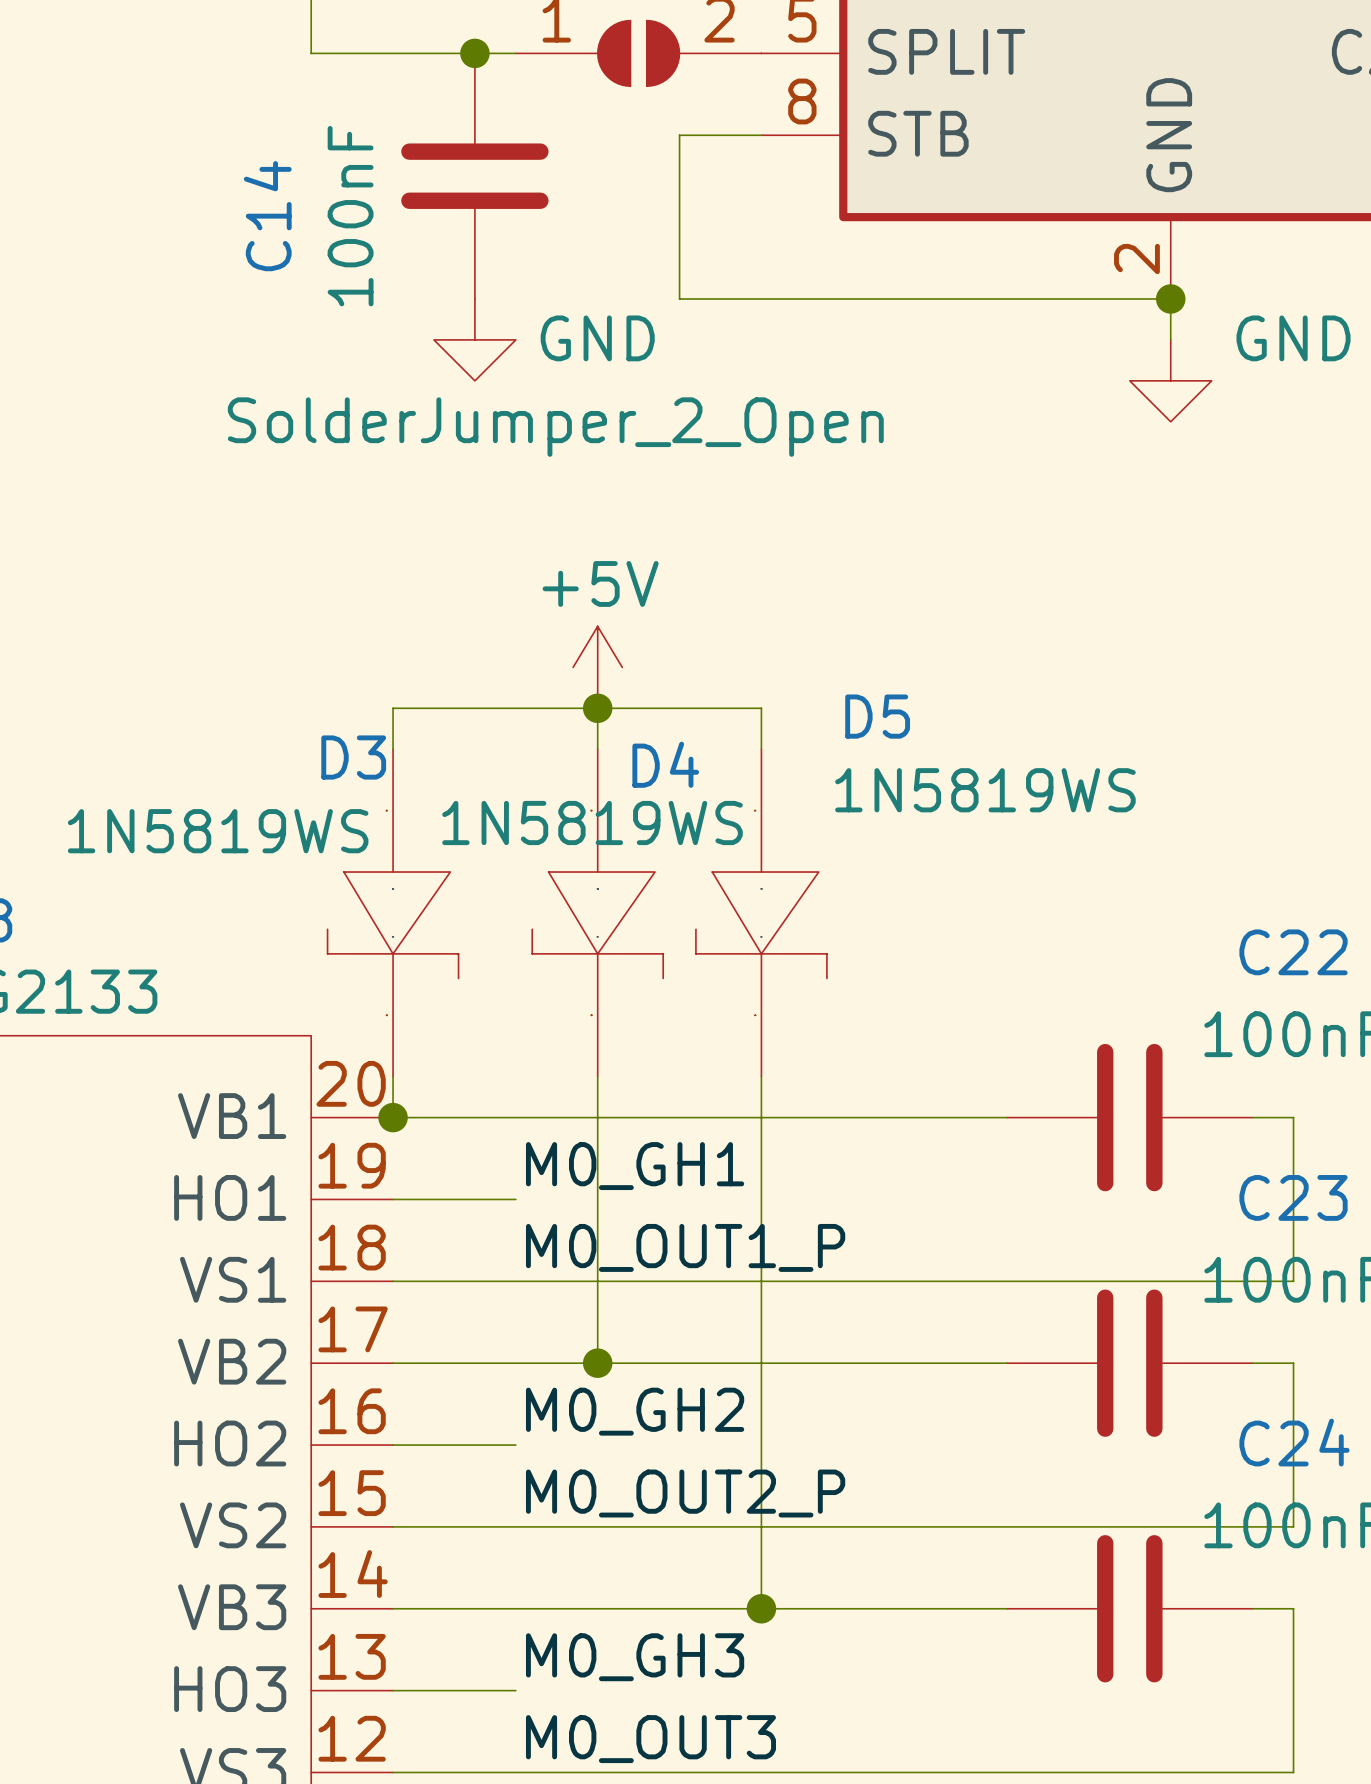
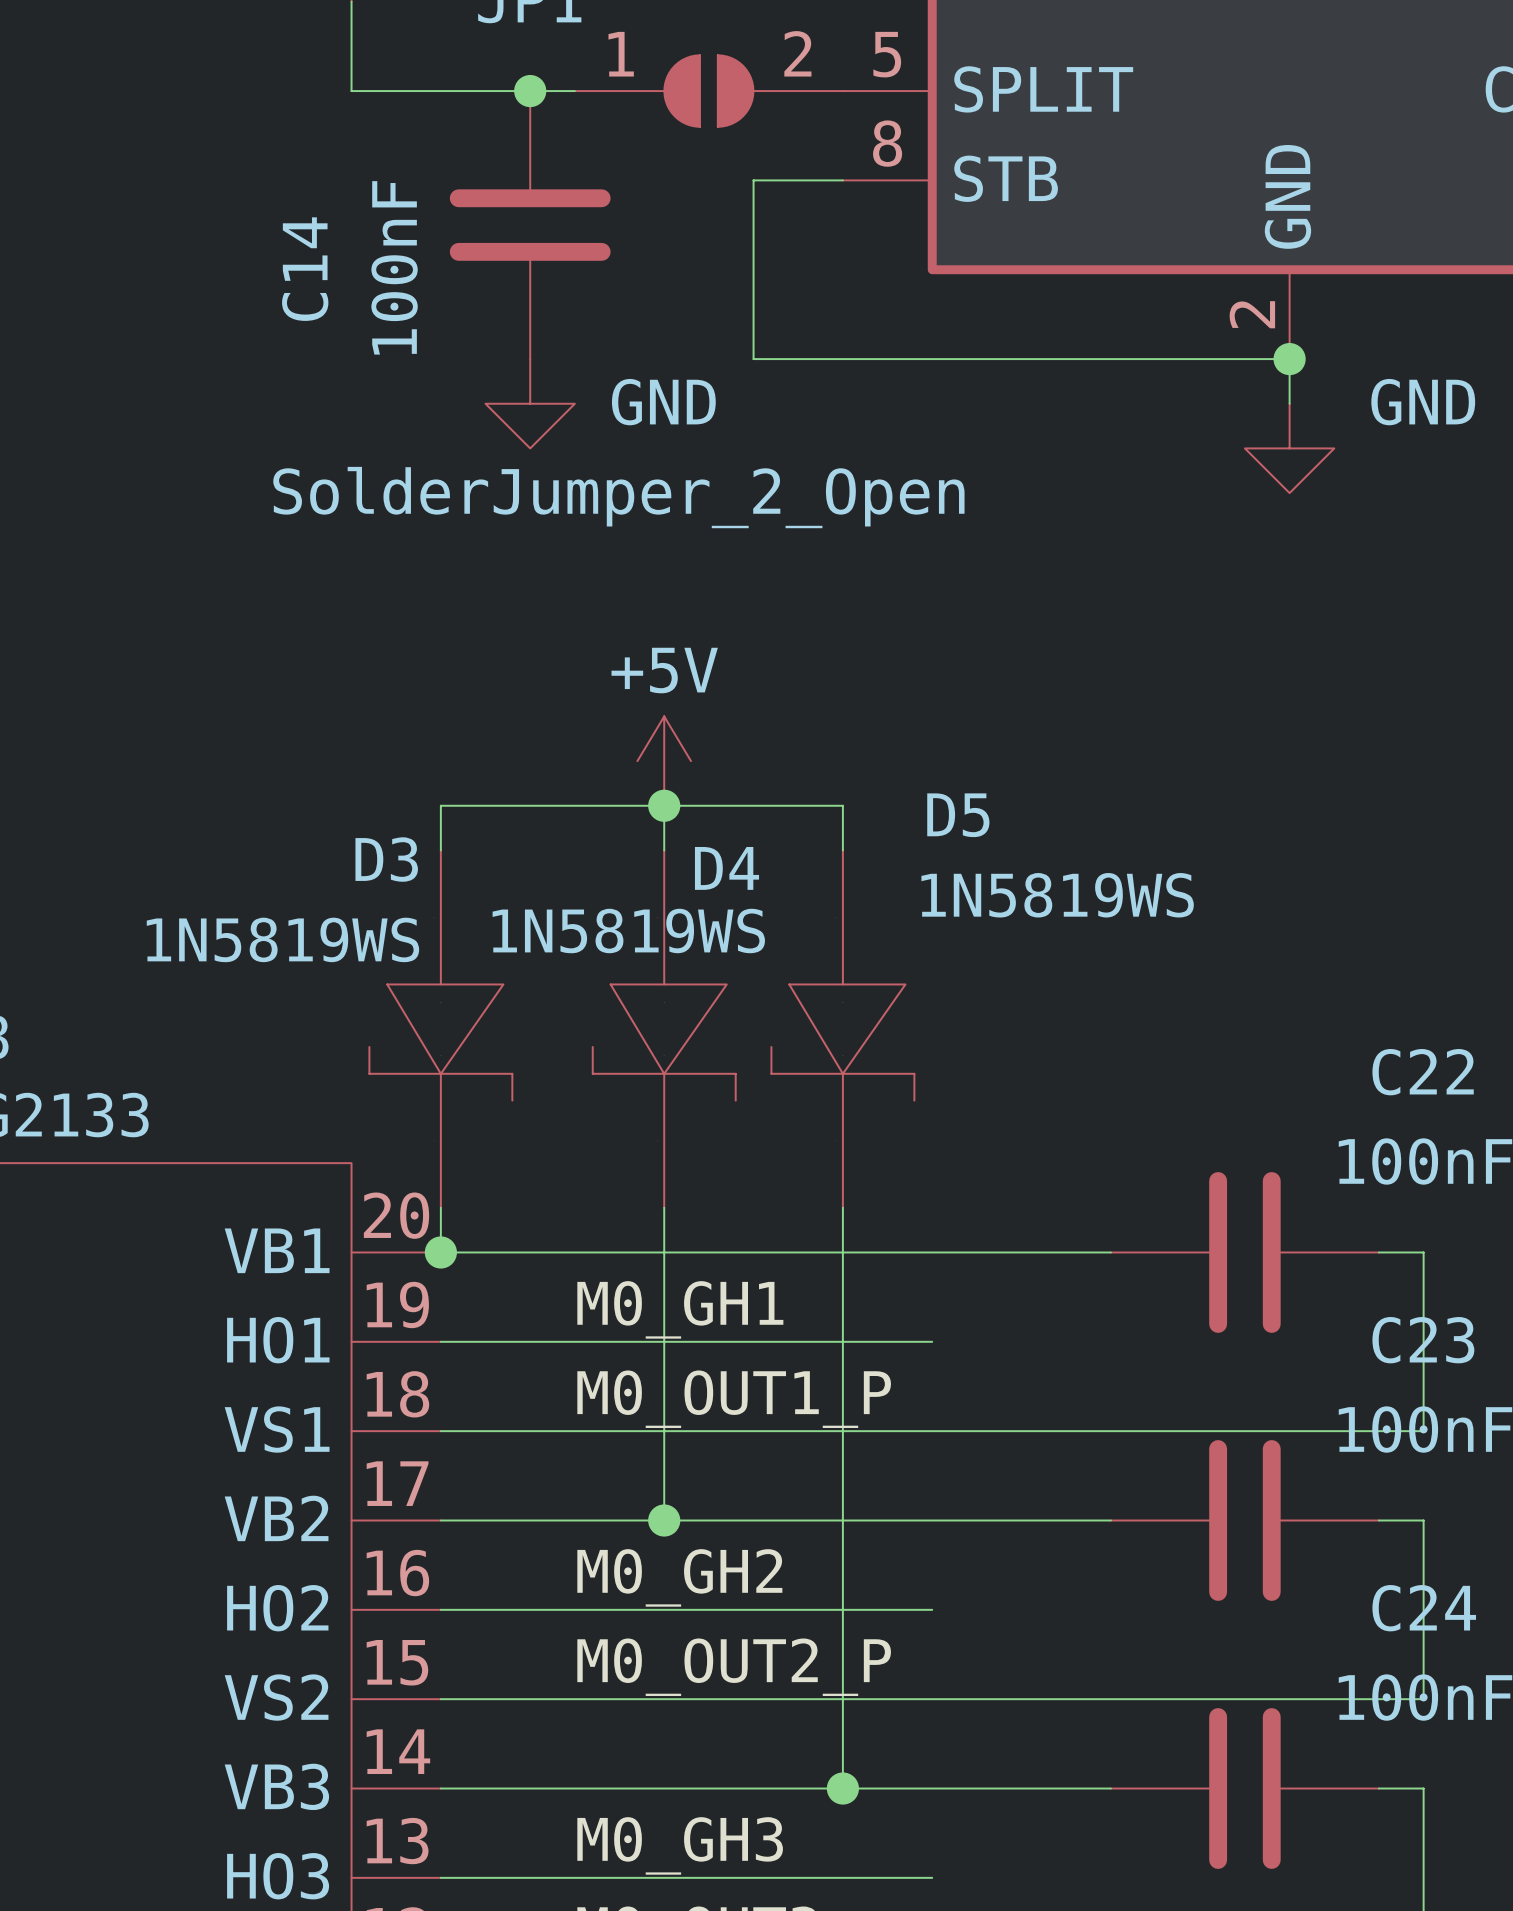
wire: none -> (574, 1341) (932, 1341)
wire: none -> (574, 1609) (932, 1609)
wire: none -> (574, 1877) (932, 1877)

